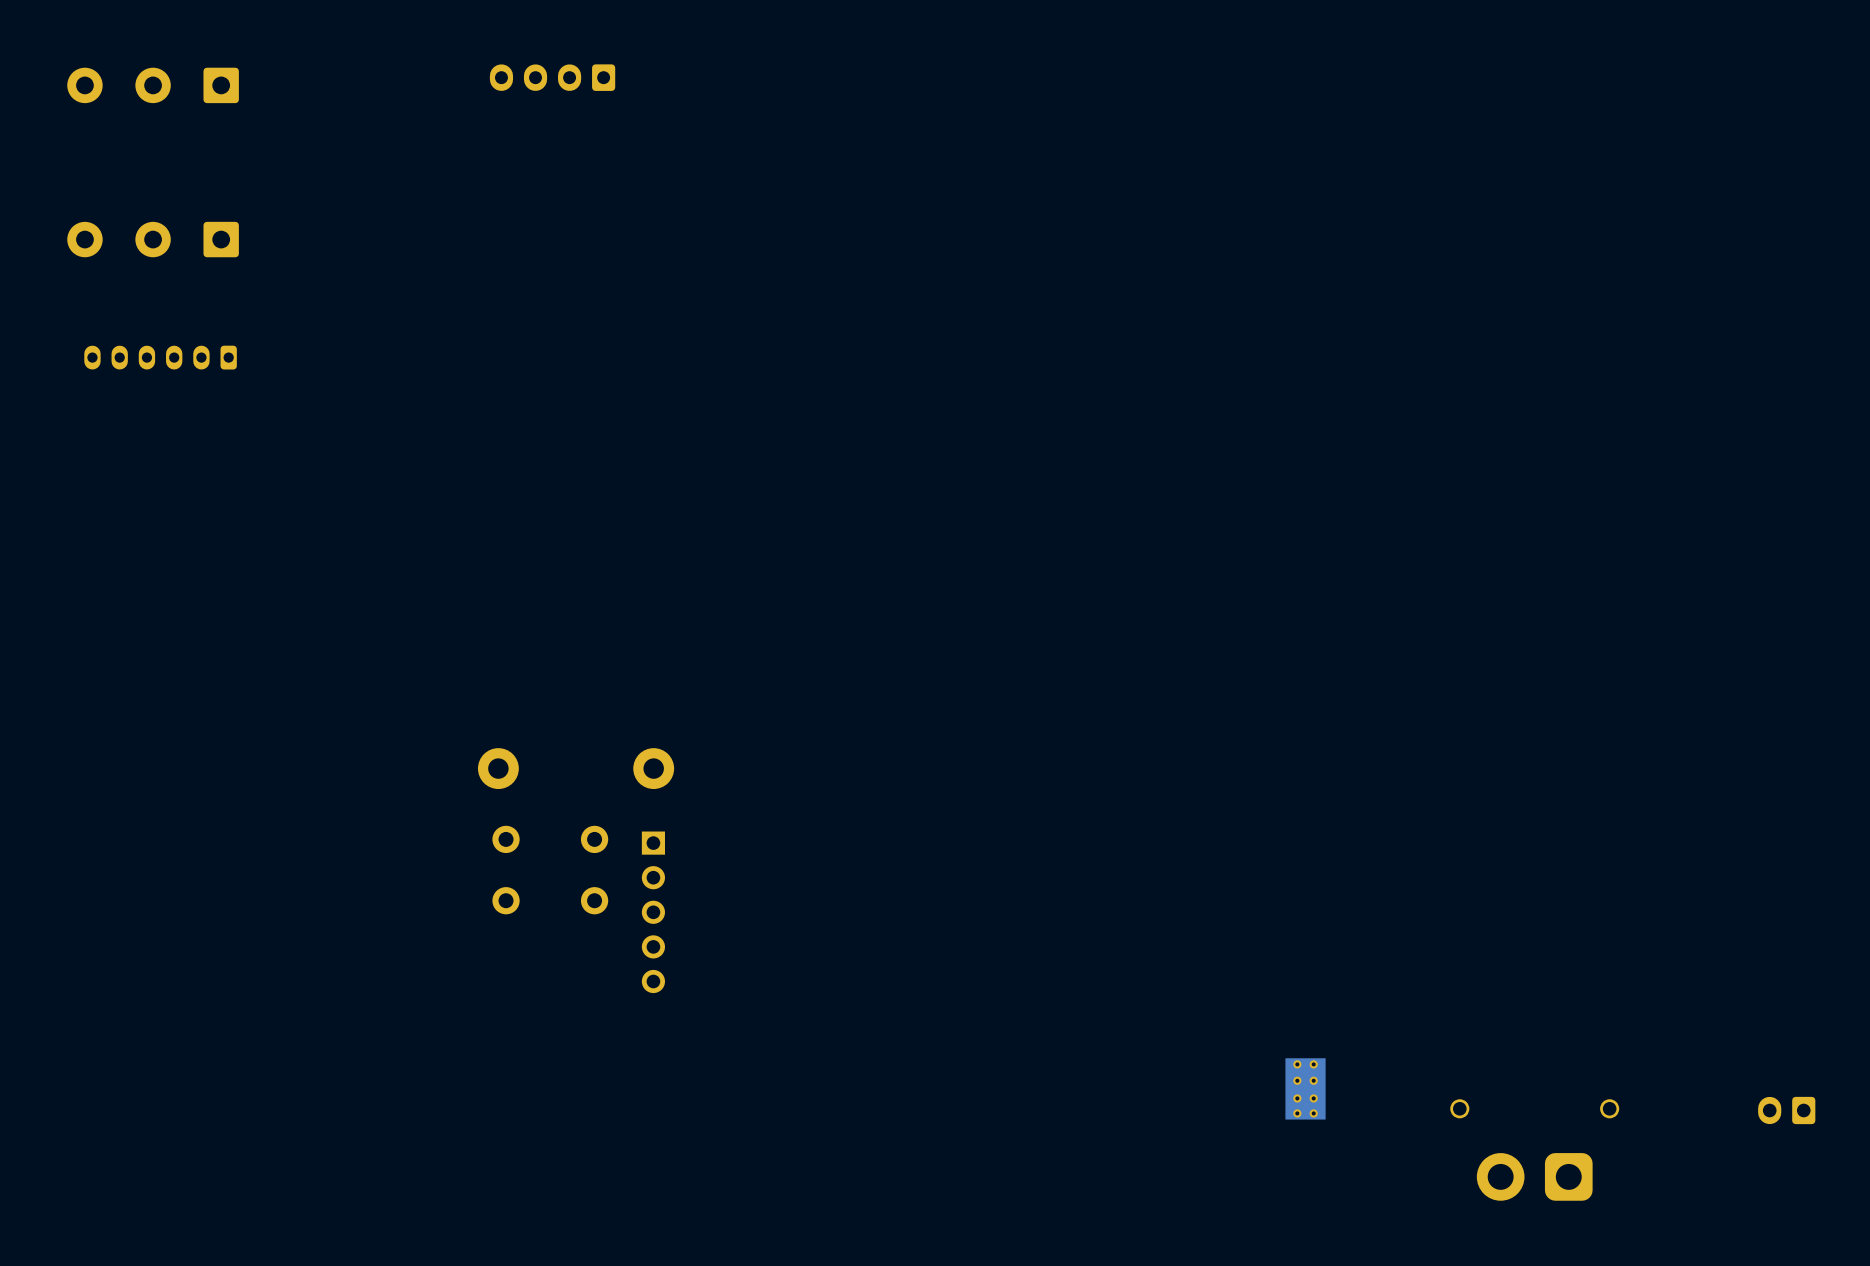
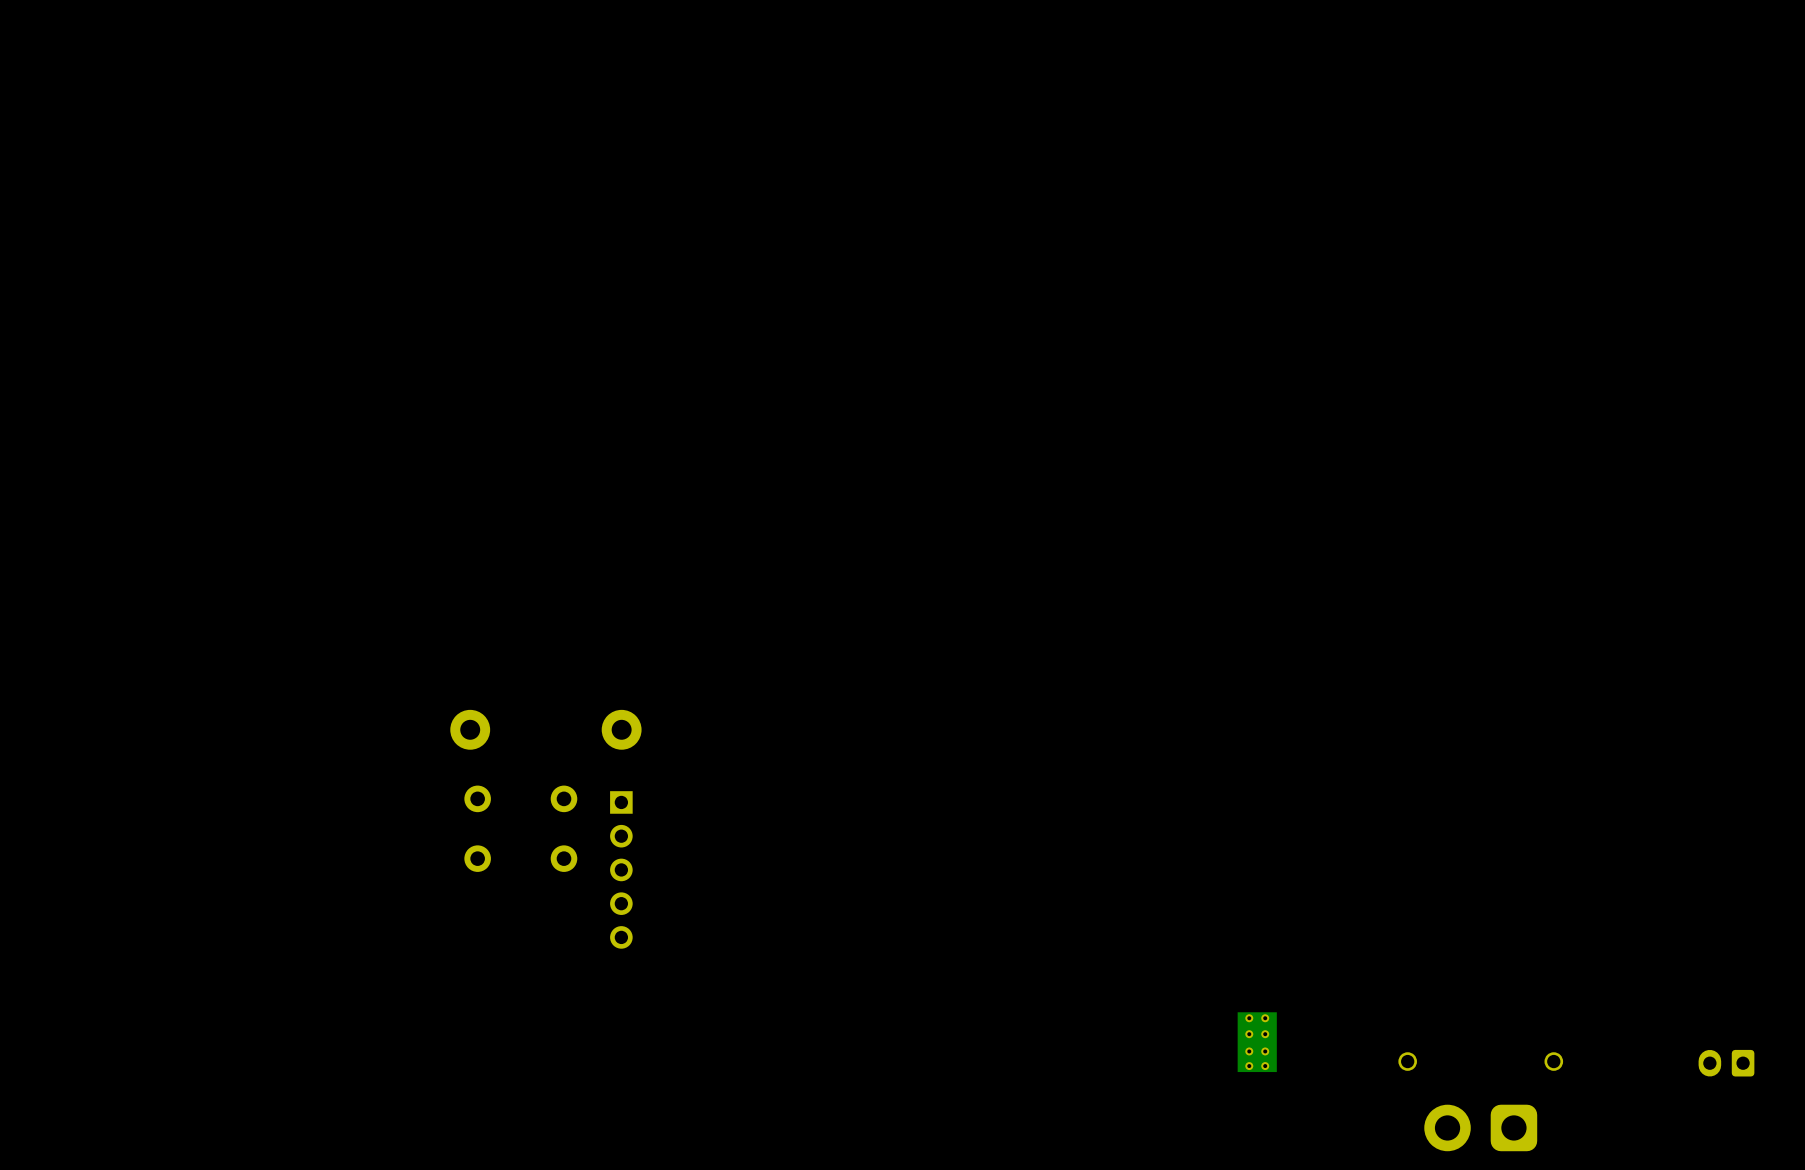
part: (552, 77) -> none
part: (153, 85) -> none
part: (153, 239) -> none
part: (160, 357) -> none

